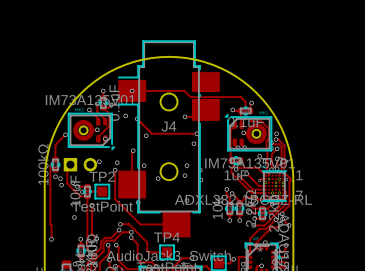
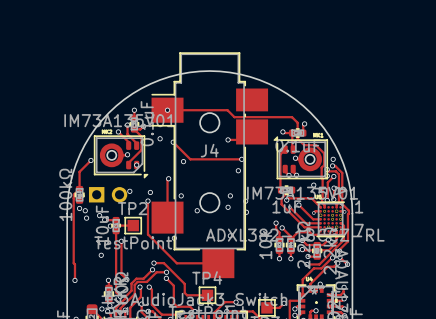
track: (70, 164) (67, 167) (67, 183) (80, 196) (87, 196) -> none

